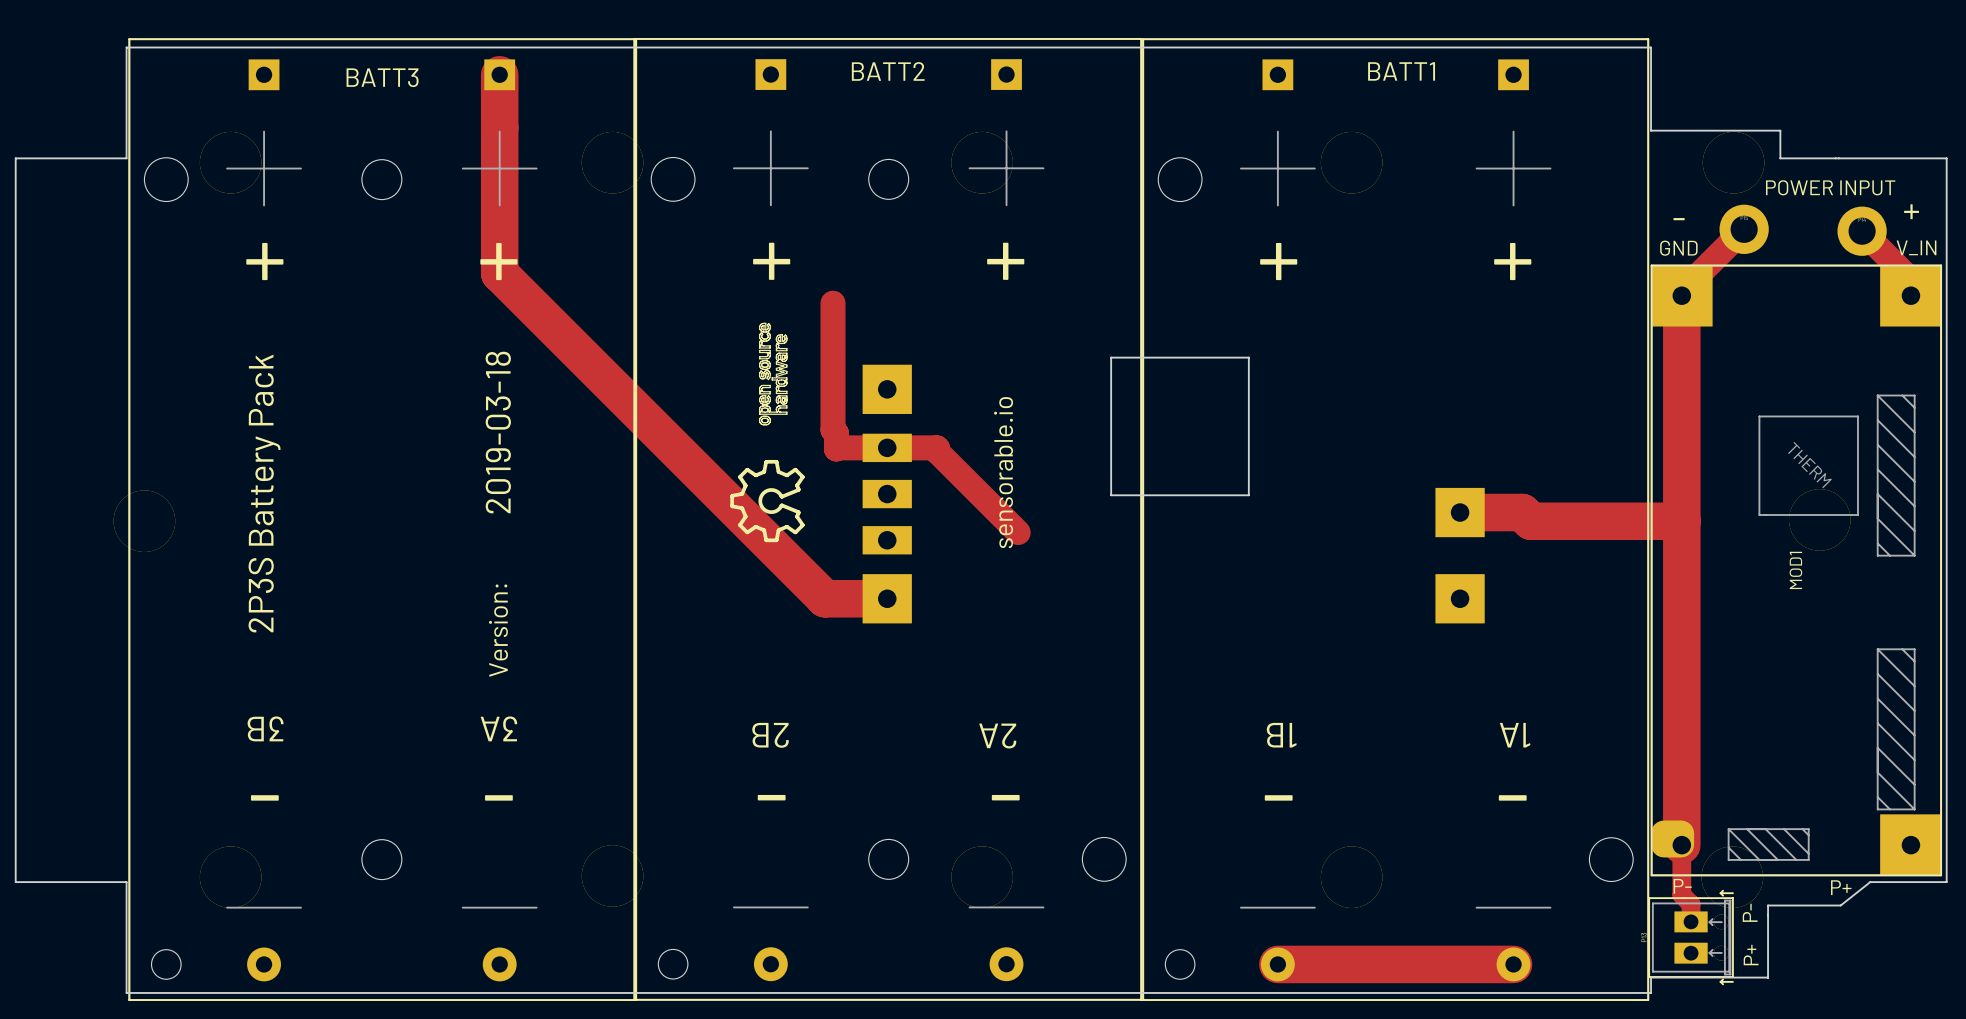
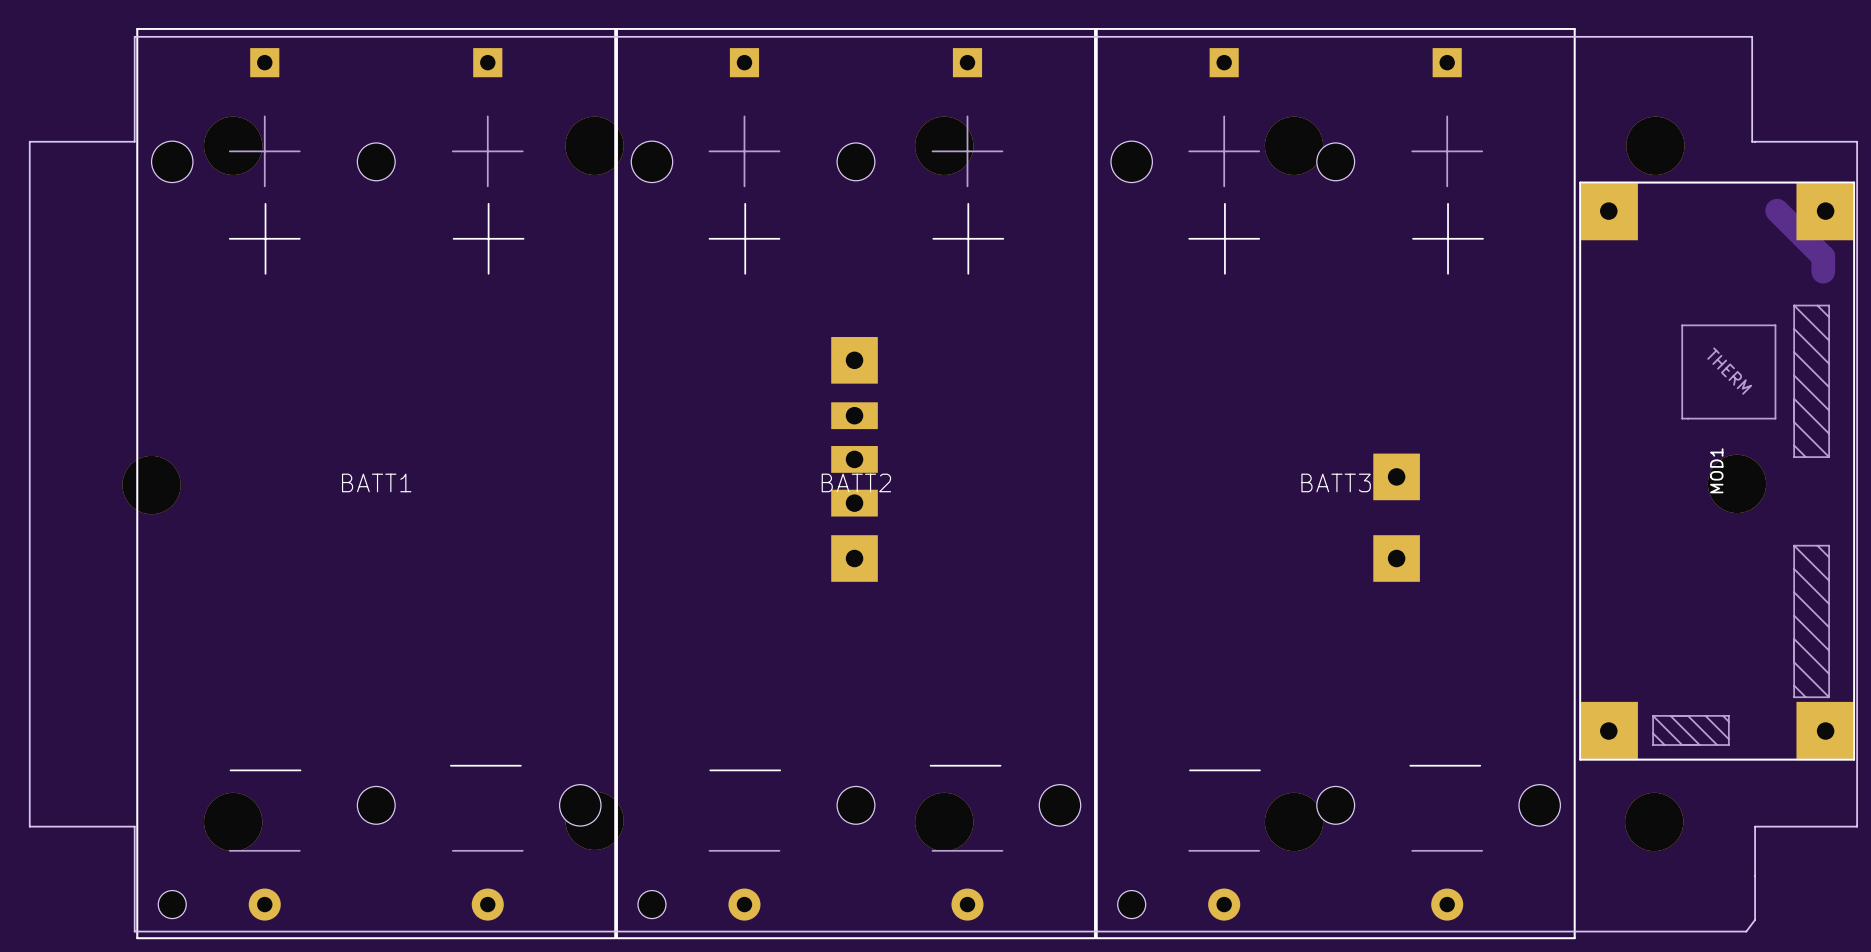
BATT3 footprint: [128, 38, 636, 1001] -> [1095, 28, 1576, 940]
BATT2 footprint: [635, 38, 1143, 1001] -> [616, 28, 1096, 940]
BATT1 footprint: [1142, 38, 1650, 1001] -> [136, 28, 617, 940]
board edge: (1651, 47) (1651, 130) (1780, 130) (1780, 158) (1835, 158) -> (1577, 36) (1752, 36) (1752, 141)
BATT2 name position: BATT2 (888, 71) -> BATT2 (856, 482)
BATT1 name position: BATT1 (1401, 71) -> BATT1 (376, 482)
track: (499, 74) (499, 273) (825, 598) (887, 598) -> none
BATT3 name position: BATT3 (382, 77) -> BATT3 (1336, 482)
text: POWER INPUT (1830, 187) -> none
text: + (1911, 211) -> none
text: - (1679, 219) -> none
track: (1744, 229) (1681, 291) (1681, 894) (1691, 904) (1691, 921) -> none
part: (1744, 229) -> none
part: (1862, 231) -> none
text: V_IN (1916, 247) -> none
text: GND (1678, 248) -> none
MOD1 footprint: [1650, 264, 1943, 877] -> [1579, 181, 1856, 761]
track: (832, 303) (832, 429) (836, 433) (836, 448) (936, 447) (937, 451) (1018, 532) -> none
line: (764, 323) (765, 323) (765, 329) (768, 328) (767, 325) (769, 324) (768, 331) (762, 331) (760, 329) (760, 325) (764, 323) -> none
line: (764, 325) (764, 329) (761, 327) (764, 325) -> none
line: (761, 332) (762, 337) (764, 339) (767, 337) (768, 332) (768, 339) (761, 339) (759, 335) (761, 332) -> none
line: (780, 334) (782, 334) (782, 341) (784, 339) (784, 336) (786, 336) (784, 342) (779, 343) (776, 341) (776, 336) (780, 334) -> none
line: (780, 336) (780, 341) (778, 339) (780, 336) -> none
line: (760, 340) (762, 345) (770, 345) (770, 348) (759, 348) (760, 340) -> none
line: (777, 343) (779, 348) (786, 348) (786, 350) (776, 350) (777, 343) -> none
line: (759, 350) (759, 352) (766, 352) (768, 354) (766, 356) (759, 356) (759, 358) (769, 357) (770, 350) (759, 350) -> none
line: (779, 353) (786, 353) (785, 360) (781, 360) (780, 355) (777, 360) (776, 355) (779, 353) -> none
line: (782, 355) (784, 356) (784, 359) (782, 358) (782, 355) -> none
board edge: (1111, 357) (1248, 357) (1248, 495) (1111, 495) (1111, 357) -> none
line: (764, 360) (760, 362) (759, 366) (762, 369) (767, 369) (770, 363) (764, 360) -> none
line: (763, 362) (763, 362) (762, 363) (762, 363) (761, 364) (762, 366) (767, 366) (767, 363) (766, 362) (764, 362) (763, 362) (763, 362) (763, 362) -> none
line: (783, 366) (776, 364) (776, 361) (786, 365) (786, 366) (779, 369) -> none
line: (783, 366) (776, 368) (783, 372) (776, 374) (776, 376) (786, 373) (786, 371) (779, 369) -> none
line: (767, 370) (762, 376) (761, 370) (760, 378) (764, 378) (767, 372) (766, 378) (768, 379) (770, 373) (767, 370) -> none
line: (772, 377) (772, 379) (777, 379) (776, 383) (778, 385) (786, 384) (786, 377) (772, 377) -> none
line: (781, 379) (782, 380) (782, 380) (783, 380) (784, 380) (784, 383) (778, 383) (778, 380) (779, 380) (780, 380) (781, 380) (781, 379) -> none
line: (763, 385) (770, 385) (770, 387) (763, 387) (761, 389) (763, 391) (770, 391) (770, 393) (759, 393) (759, 387) (763, 385) -> none
line: (777, 386) (779, 391) (786, 391) (786, 393) (776, 393) (777, 386) -> none
line: (764, 395) (765, 395) (765, 402) (768, 400) (767, 397) (769, 397) (768, 403) (762, 404) (760, 401) (760, 397) (764, 395) -> none
line: (779, 395) (786, 395) (785, 403) (781, 403) (780, 397) (777, 402) (776, 398) (779, 395) -> none
line: (764, 397) (764, 402) (761, 399) (764, 397) -> none
line: (782, 397) (782, 401) (784, 402) (784, 398) (782, 397) -> none
line: (764, 405) (760, 407) (759, 414) (786, 414) (786, 412) (779, 412) (778, 410) (779, 408) (786, 407) (786, 405) (777, 406) (777, 412) (769, 412) (769, 407) (764, 405) -> none
line: (764, 407) (767, 408) (767, 411) (762, 411) (762, 408) (764, 407) -> none
line: (763, 416) (760, 418) (760, 422) (762, 424) (768, 424) (769, 418) (763, 416) -> none
line: (763, 418) (767, 419) (767, 422) (762, 422) (763, 418) -> none
text: 2019-03-18 (498, 432) -> none
line: (766, 461) (776, 461) (778, 471) (786, 475) (795, 469) (802, 477) (797, 485) (798, 490) (781, 496) (776, 491) (769, 490) (761, 496) (761, 505) (766, 511) (775, 511) (781, 505) (798, 512) (797, 516) (802, 525) (795, 532) (786, 526) (778, 530) (776, 540) (766, 540) (764, 530) (756, 526) (747, 532) (740, 525) (745, 516) (742, 508) (732, 505) (732, 495) (742, 493) (745, 485) (740, 476) (747, 469) (755, 475) (764, 471) (766, 461) -> none
text: sensorable.io (1003, 472) -> none
text: 2P3S Battery Pack (264, 493) -> none
track: (1460, 512) (1522, 512) (1530, 521) (1681, 521) -> none
text: Version: (498, 630) -> none
text: 3B (265, 728) -> none
text: 3A (498, 728) -> none
text: 2B (770, 735) -> none
text: 1B (1281, 735) -> none
text: 1A (1515, 735) -> none
text: 2A (997, 736) -> none
board edge: (1870, 882) (1840, 905) (1768, 905) (1768, 978) -> (1784, 826) (1755, 826) (1755, 919) (1746, 931) (1577, 931)
text: P- (1682, 886) -> none
text: P+ (1841, 887) -> none
text: P- (1750, 912) -> none
part: (1691, 937) -> none
text: P+ (1751, 955) -> none
track: (1277, 964) (1513, 964) -> none
board edge: (1768, 977) (1651, 977) (1651, 992) -> none

